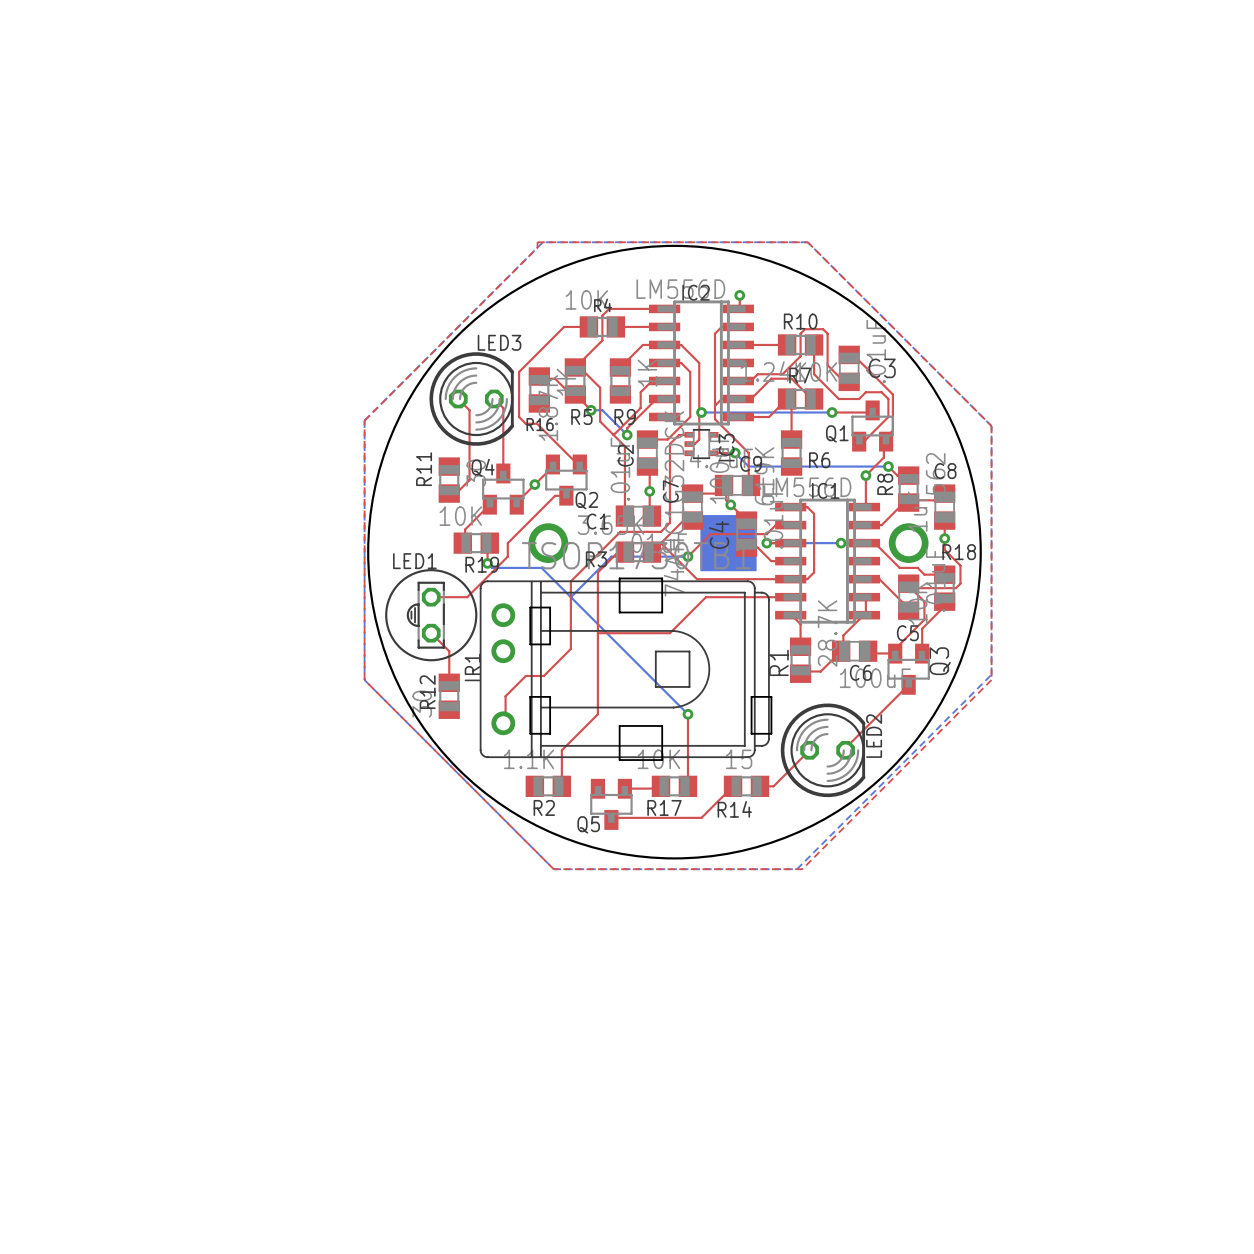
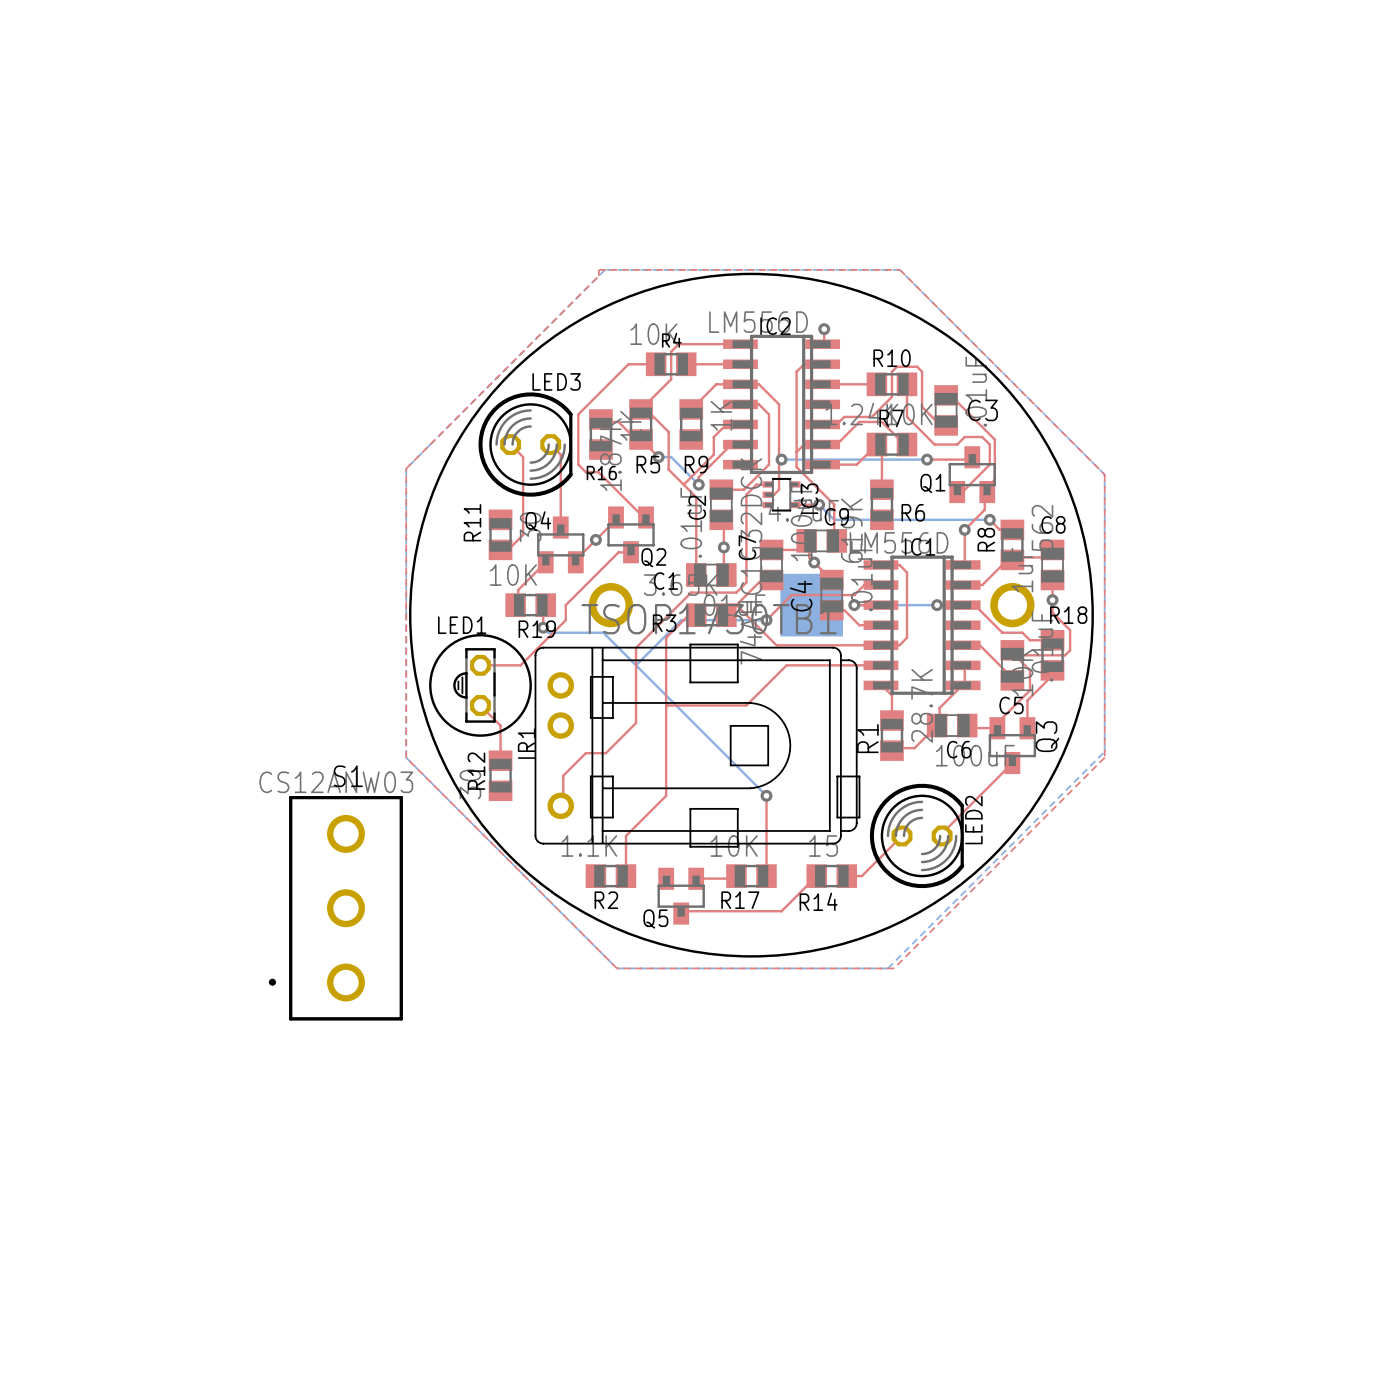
S1: none -> CS12ANW03 (335, 908)

